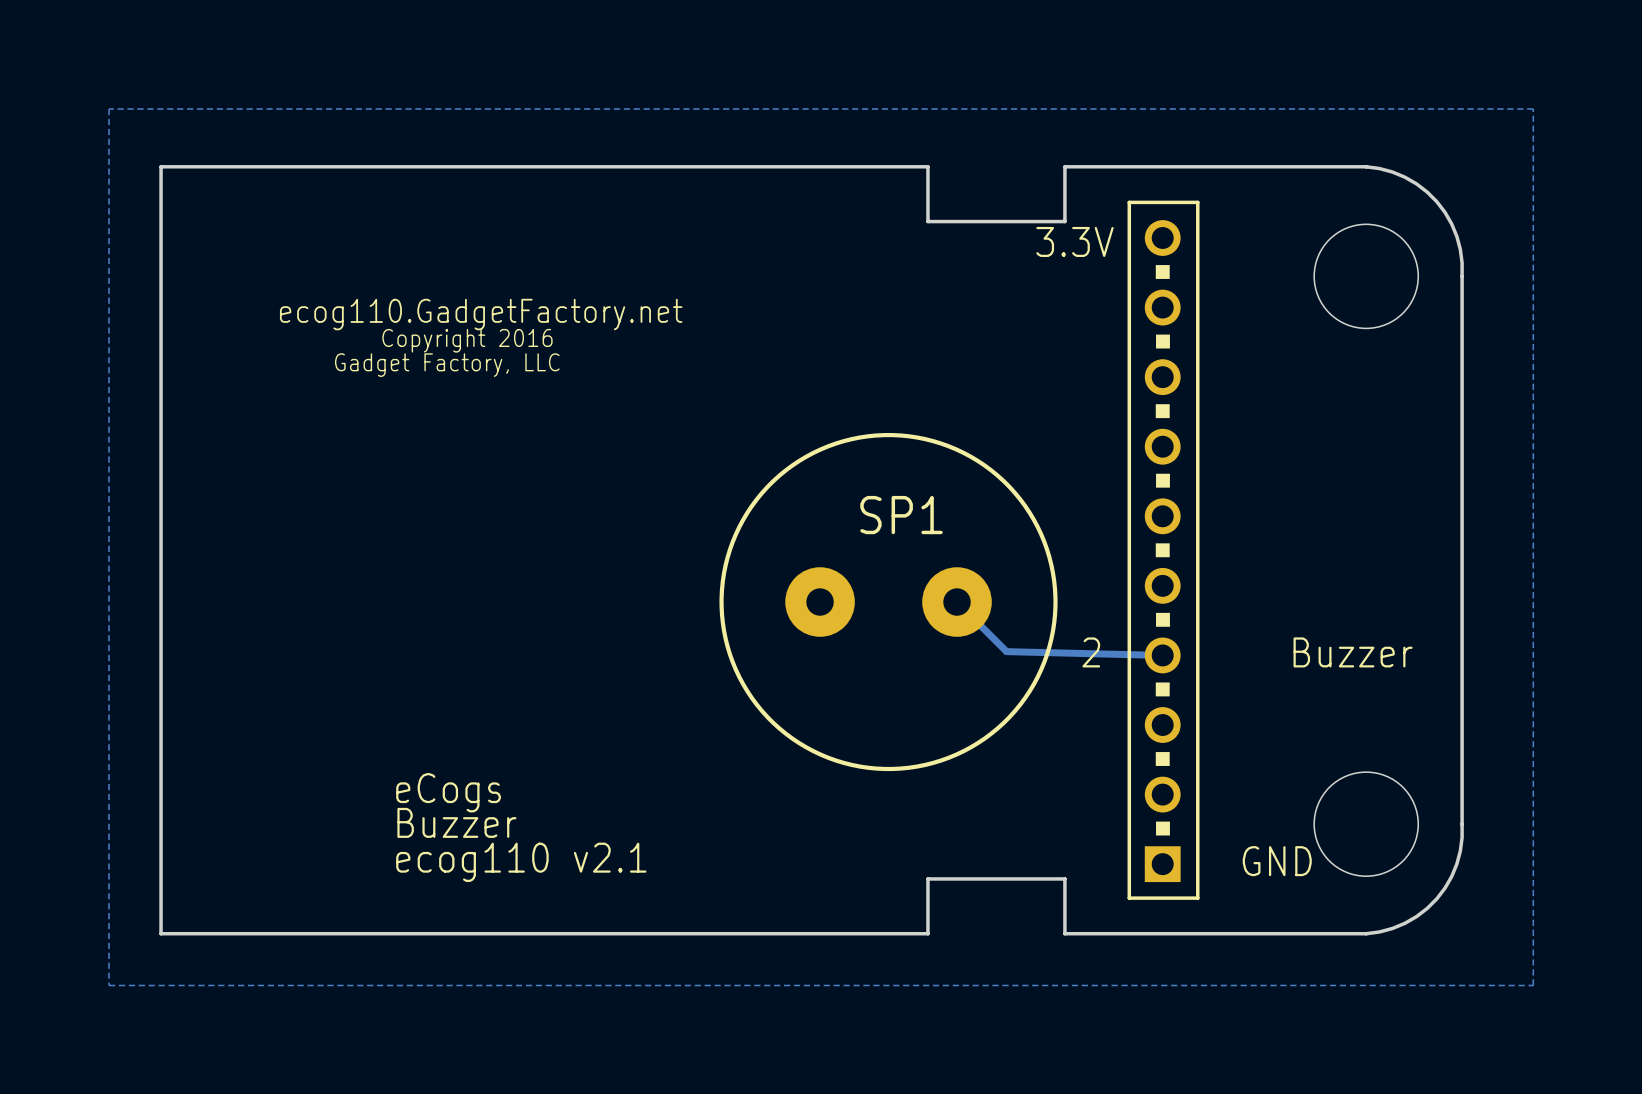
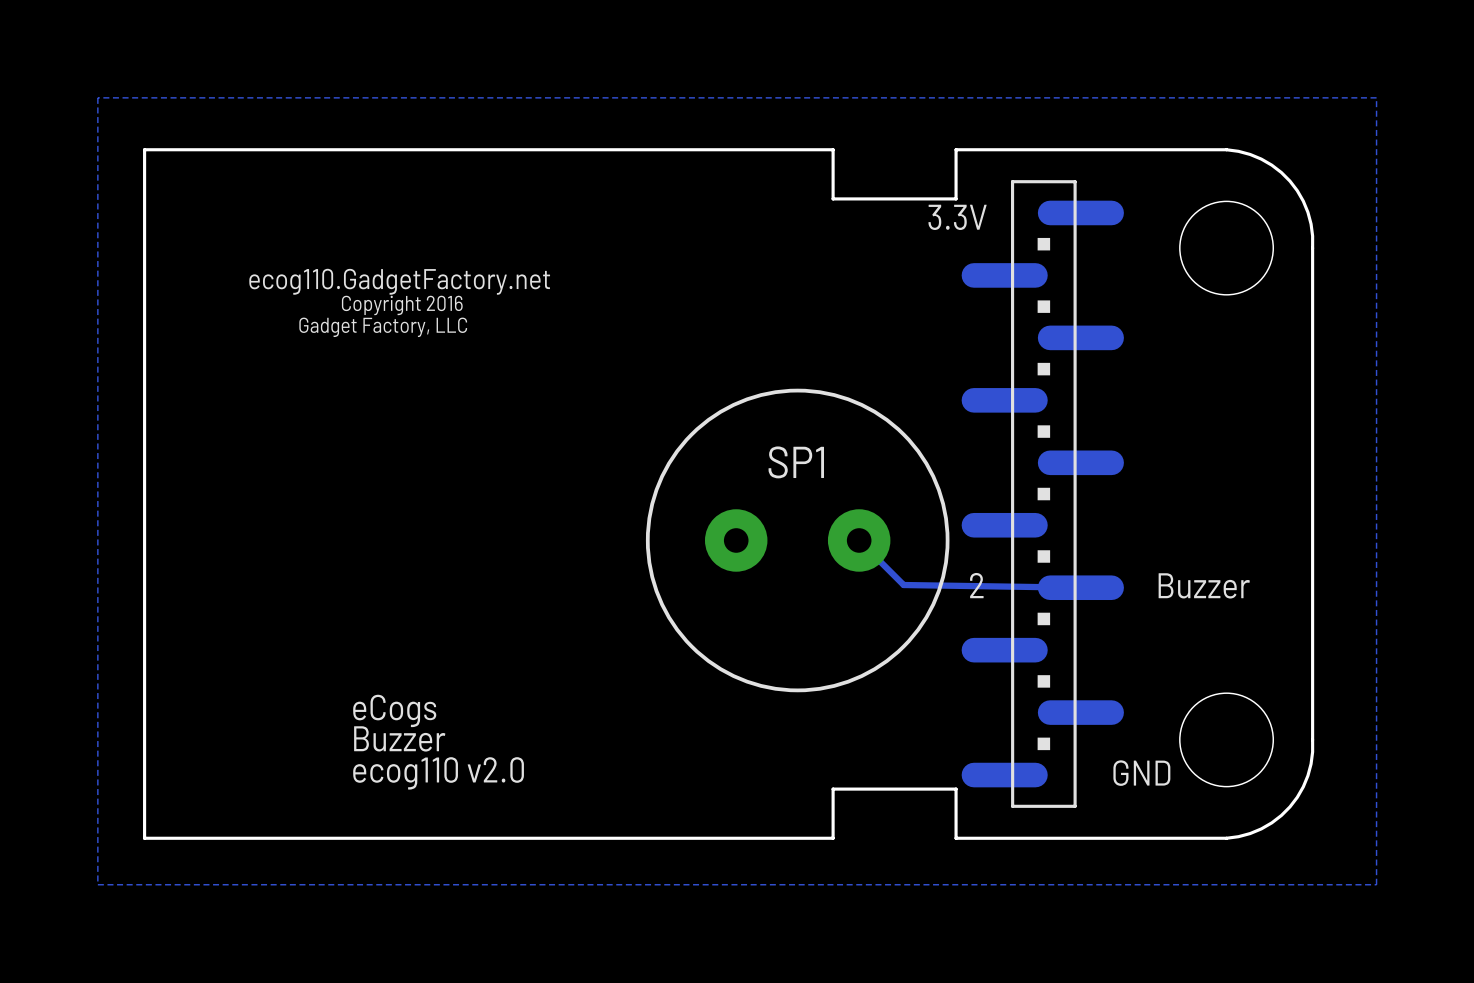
part footprint: [159, 165, 1464, 936] -> [143, 148, 1315, 840]
track: (1006, 651) (1162, 655) -> (903, 585) (1080, 587)
text: ecog110 v2.1 (521, 862) -> ecog110 v2.0 (438, 773)

